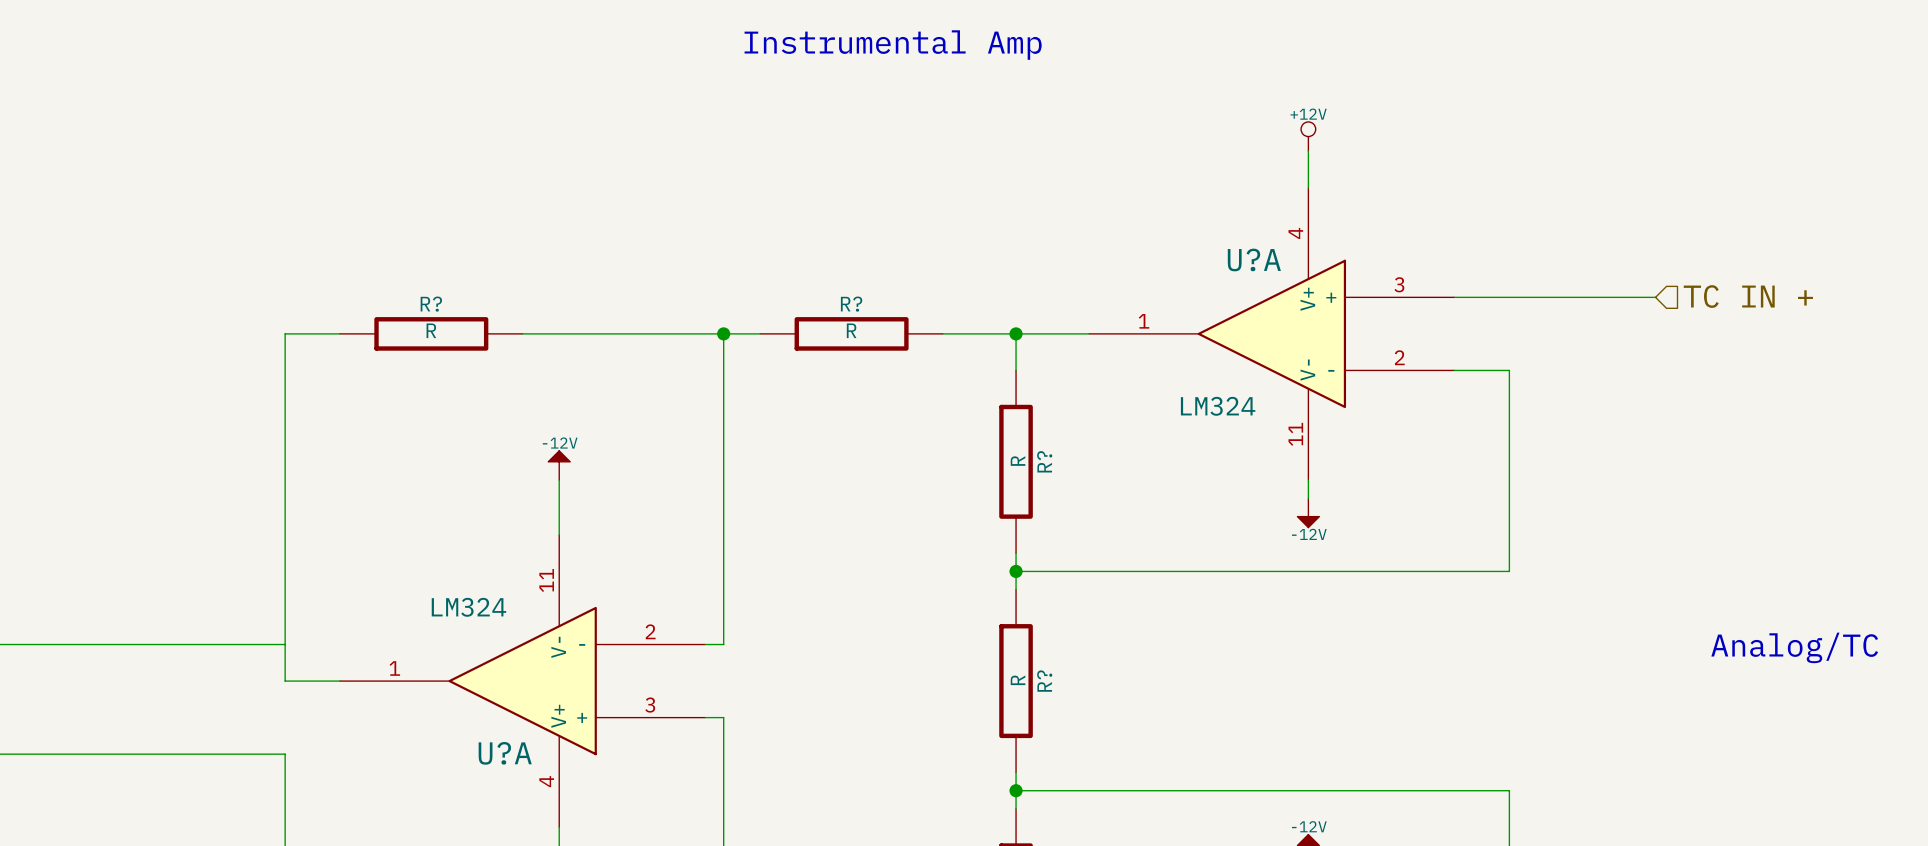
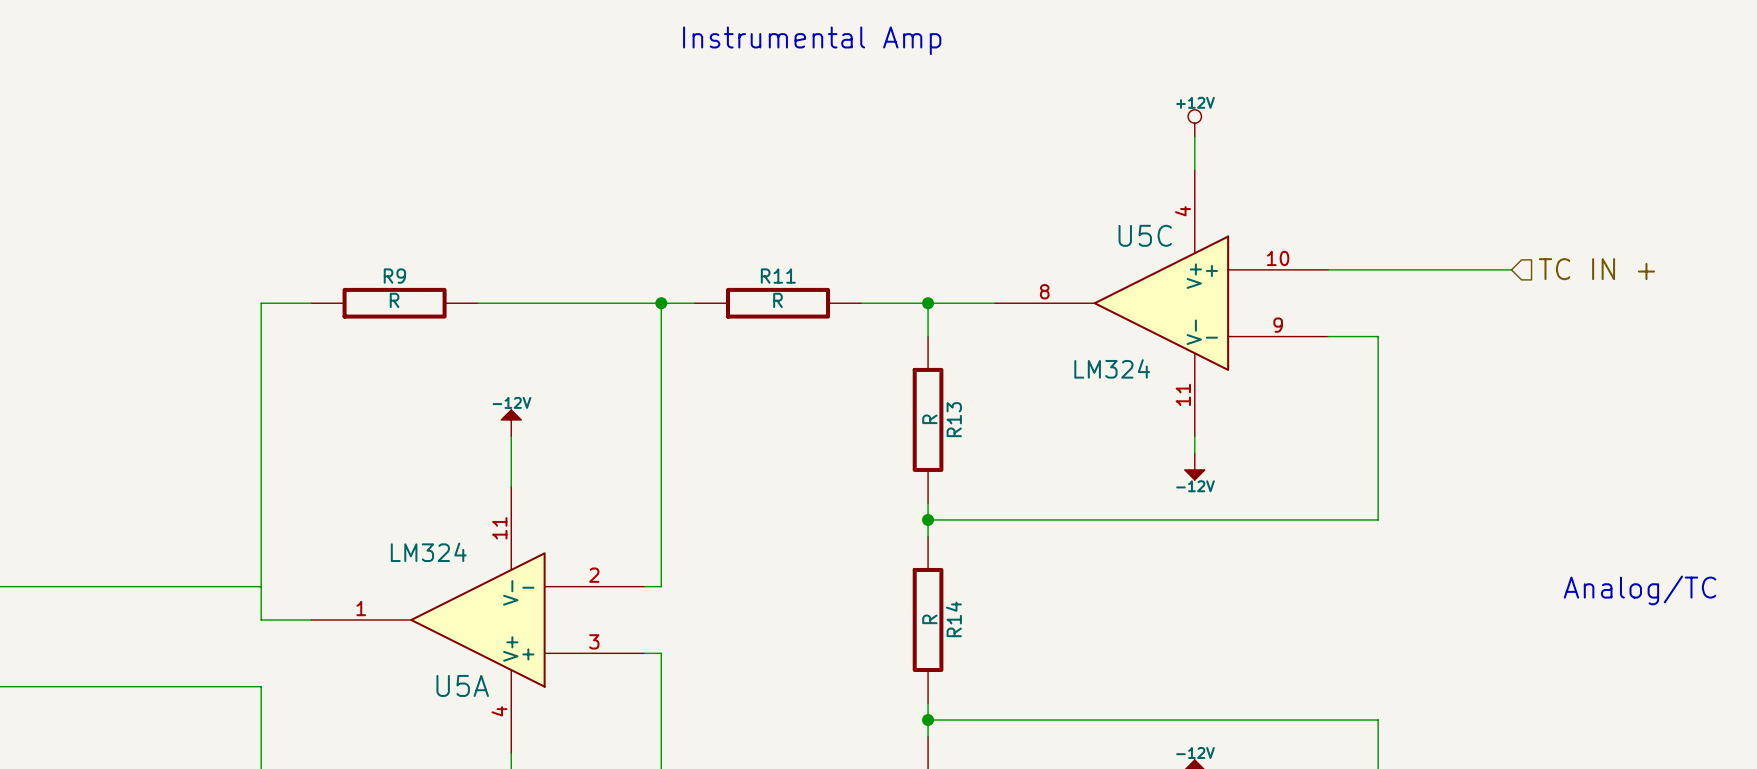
U?A name: U?A (1254, 259) -> U5C (1145, 235)
U?A pin number: 3 (1399, 284) -> 10 (1278, 258)
R? name: R? (431, 304) -> R9 (394, 276)
R? name: R? (851, 304) -> R11 (778, 276)
U?A pin number: 1 (1144, 321) -> 8 (1044, 291)
U?A pin number: 2 (1399, 357) -> 9 (1278, 325)
R? name: R? (1044, 461) -> R13 (954, 419)
R? name: R? (1044, 681) -> R14 (953, 619)
U?A name: U?A (505, 753) -> U5A (462, 685)

